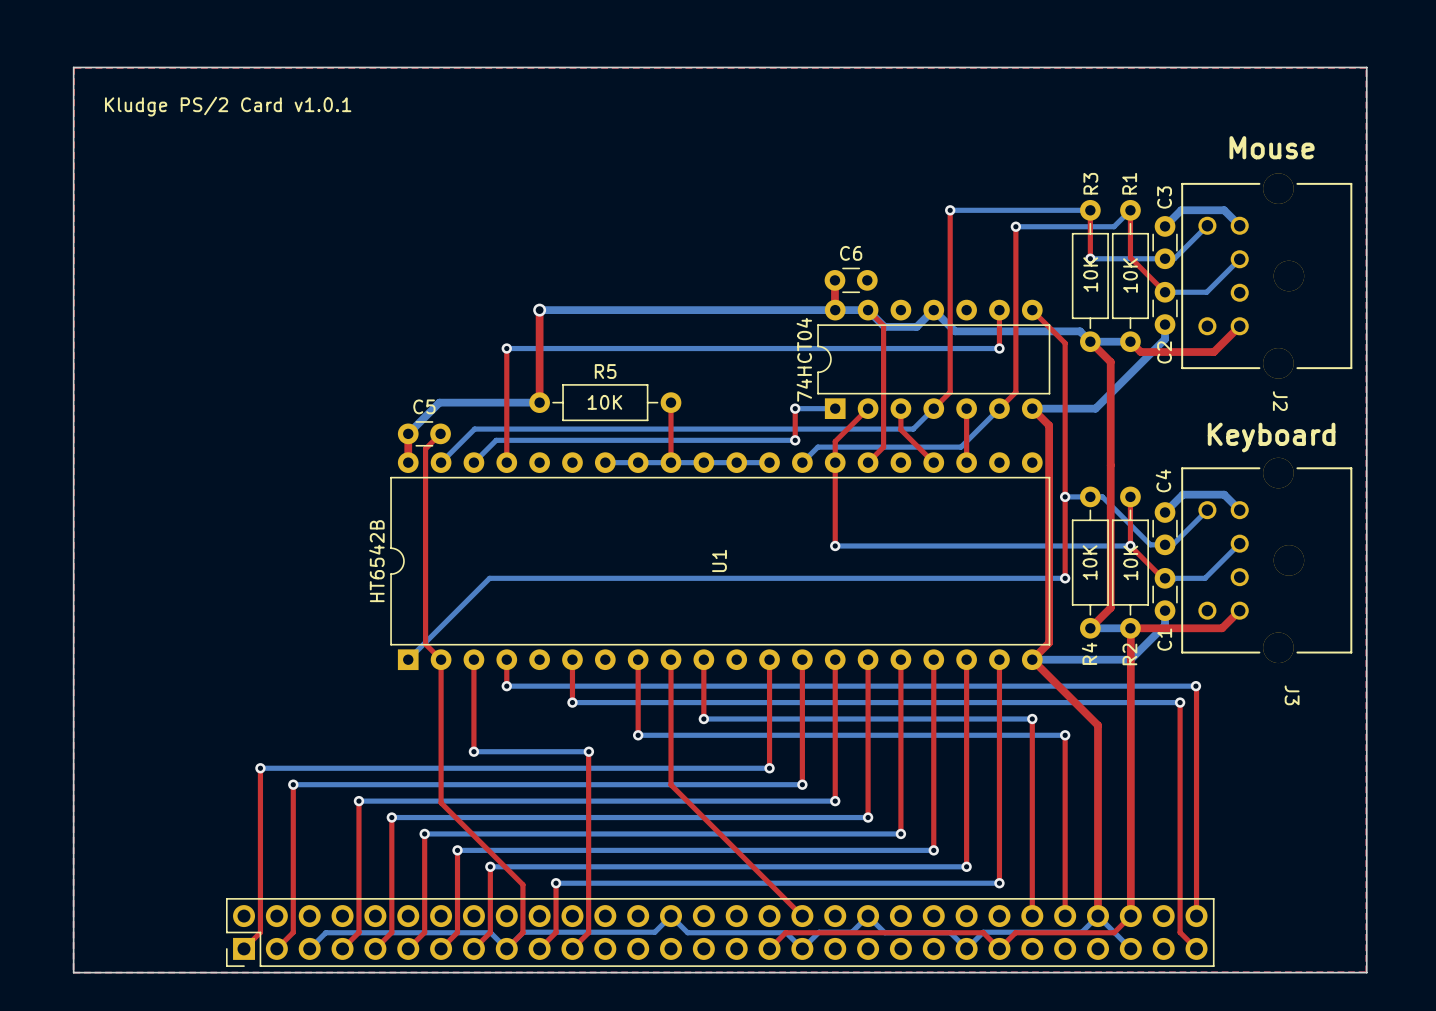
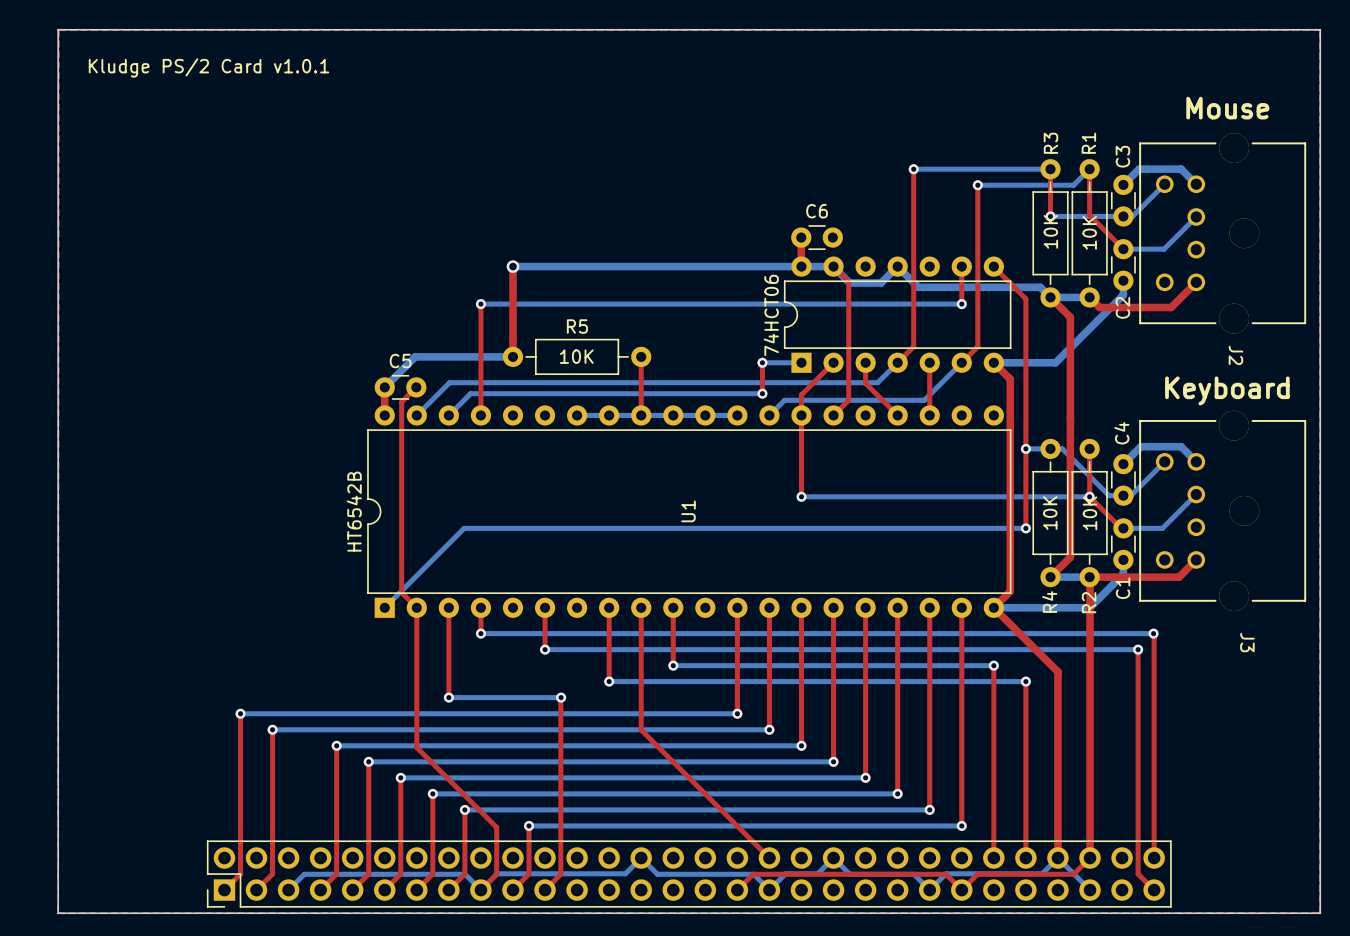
text: 74HCT04 (804, 359) -> 74HCT06 (771, 315)

